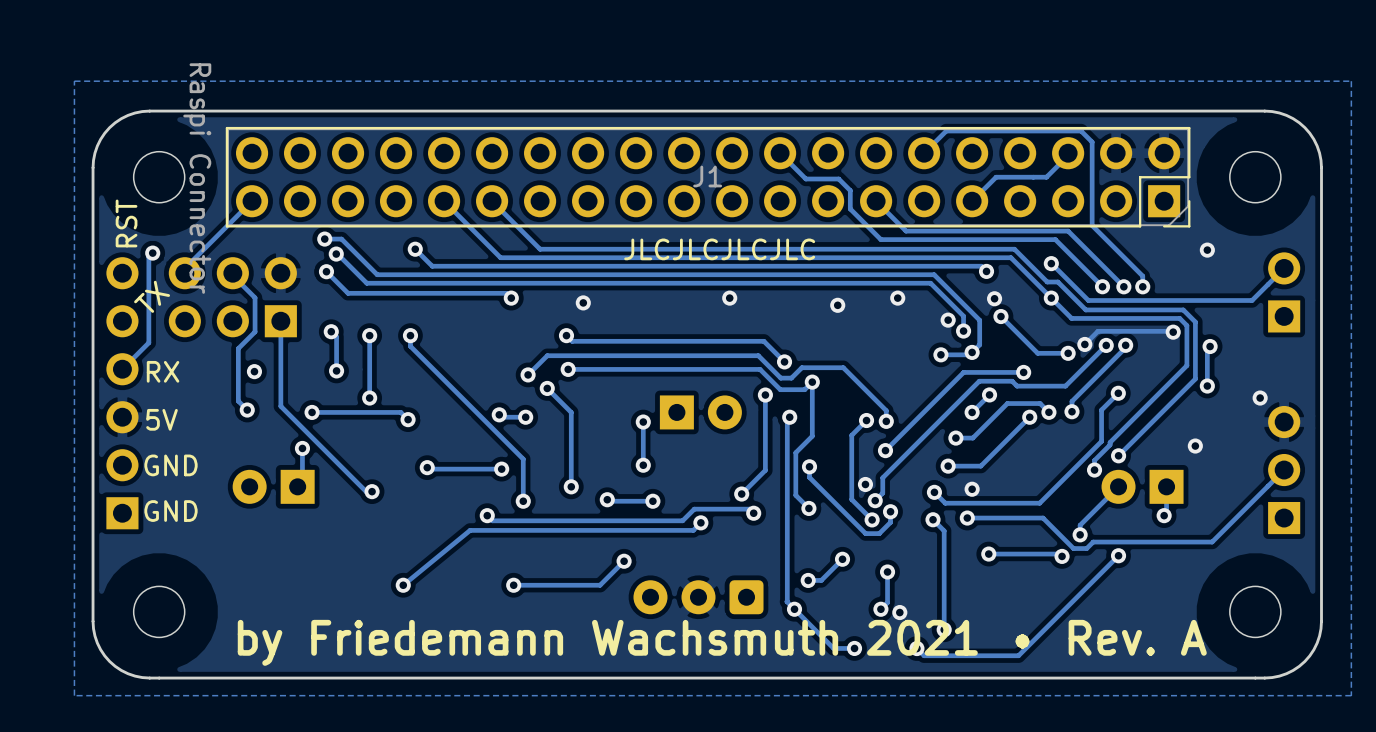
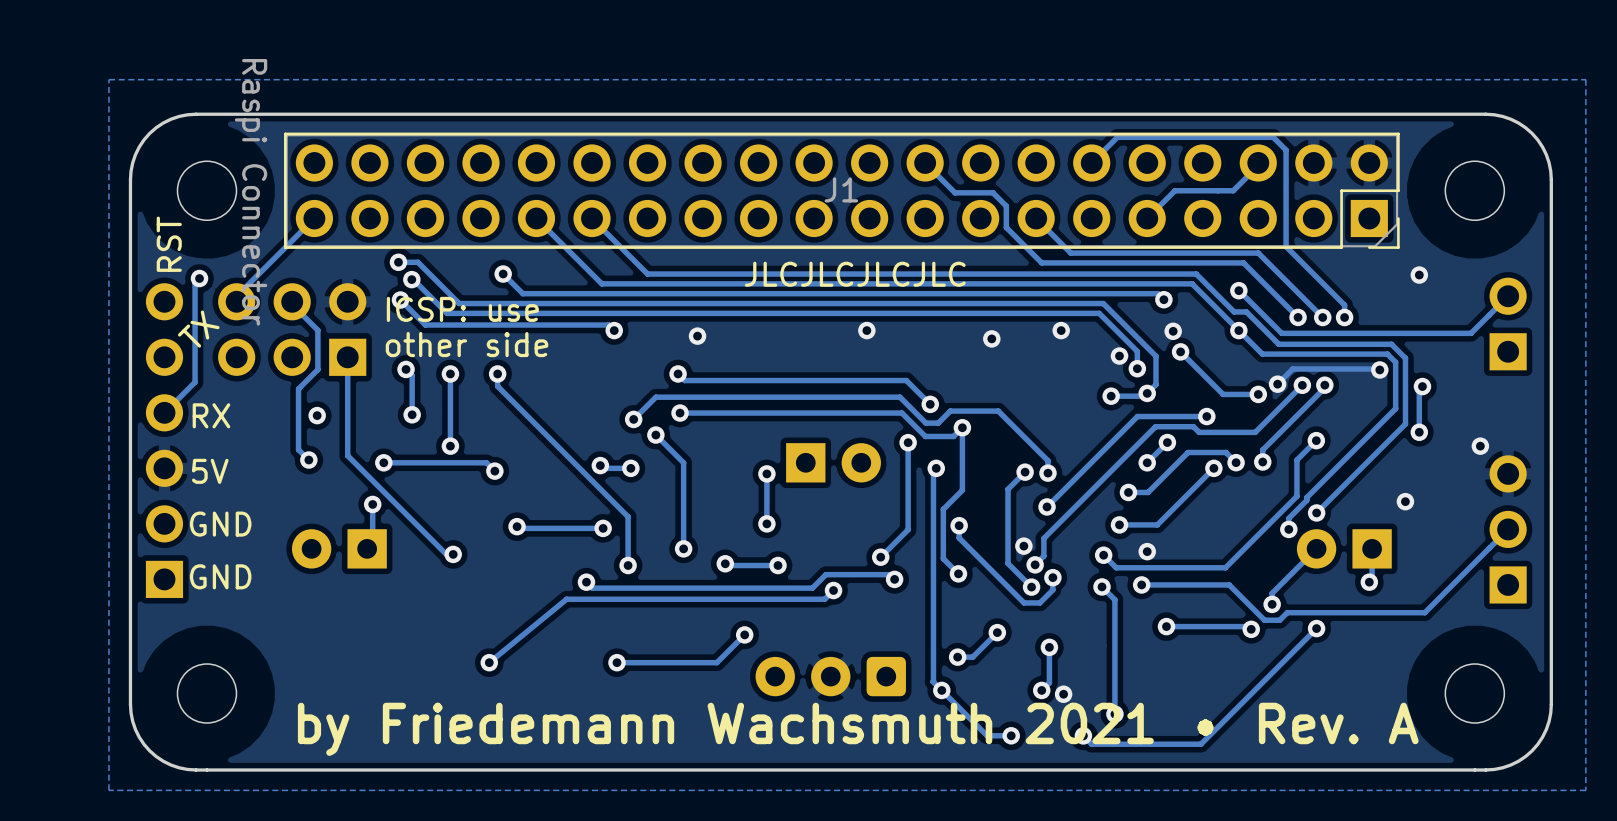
text: none -> ICSP: use (462, 309)
text: none -> other side (467, 344)

